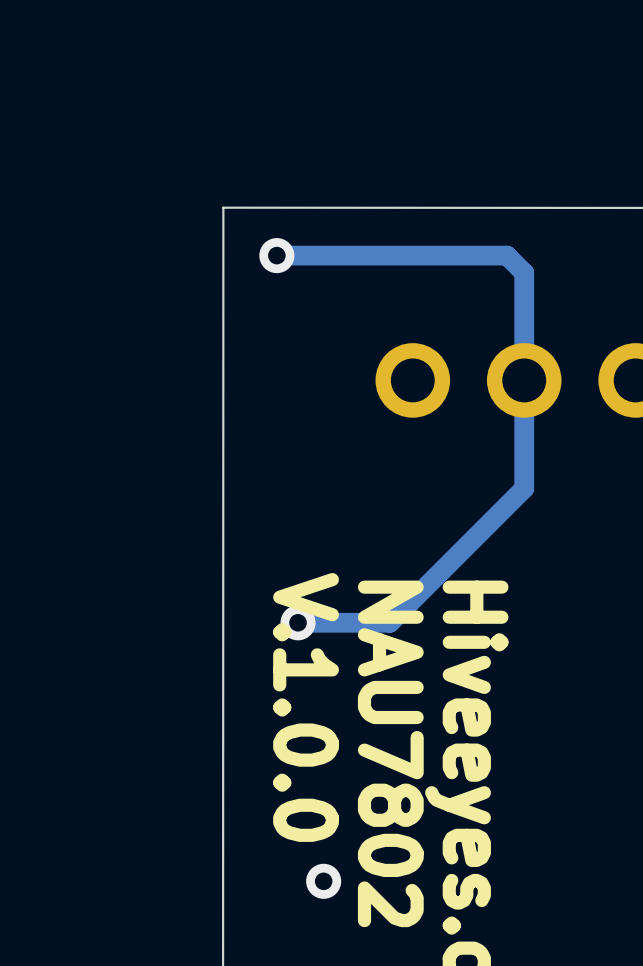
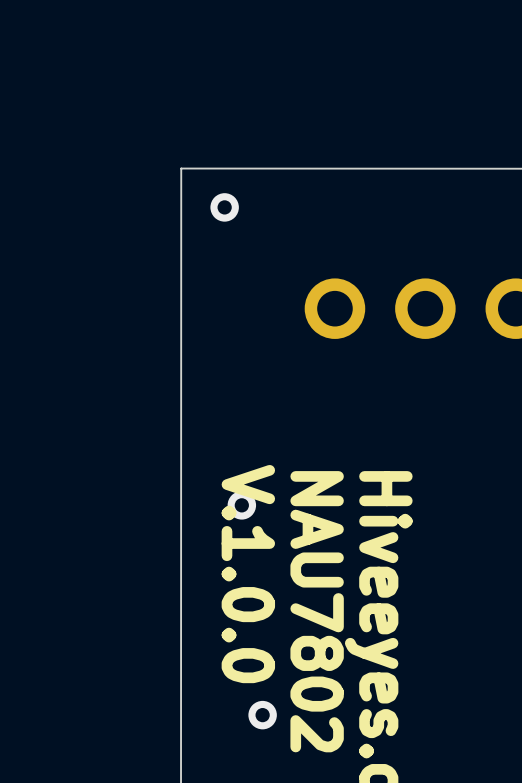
track: (276, 255) (506, 255) (524, 272) (524, 488) (389, 622) (298, 622) -> none

